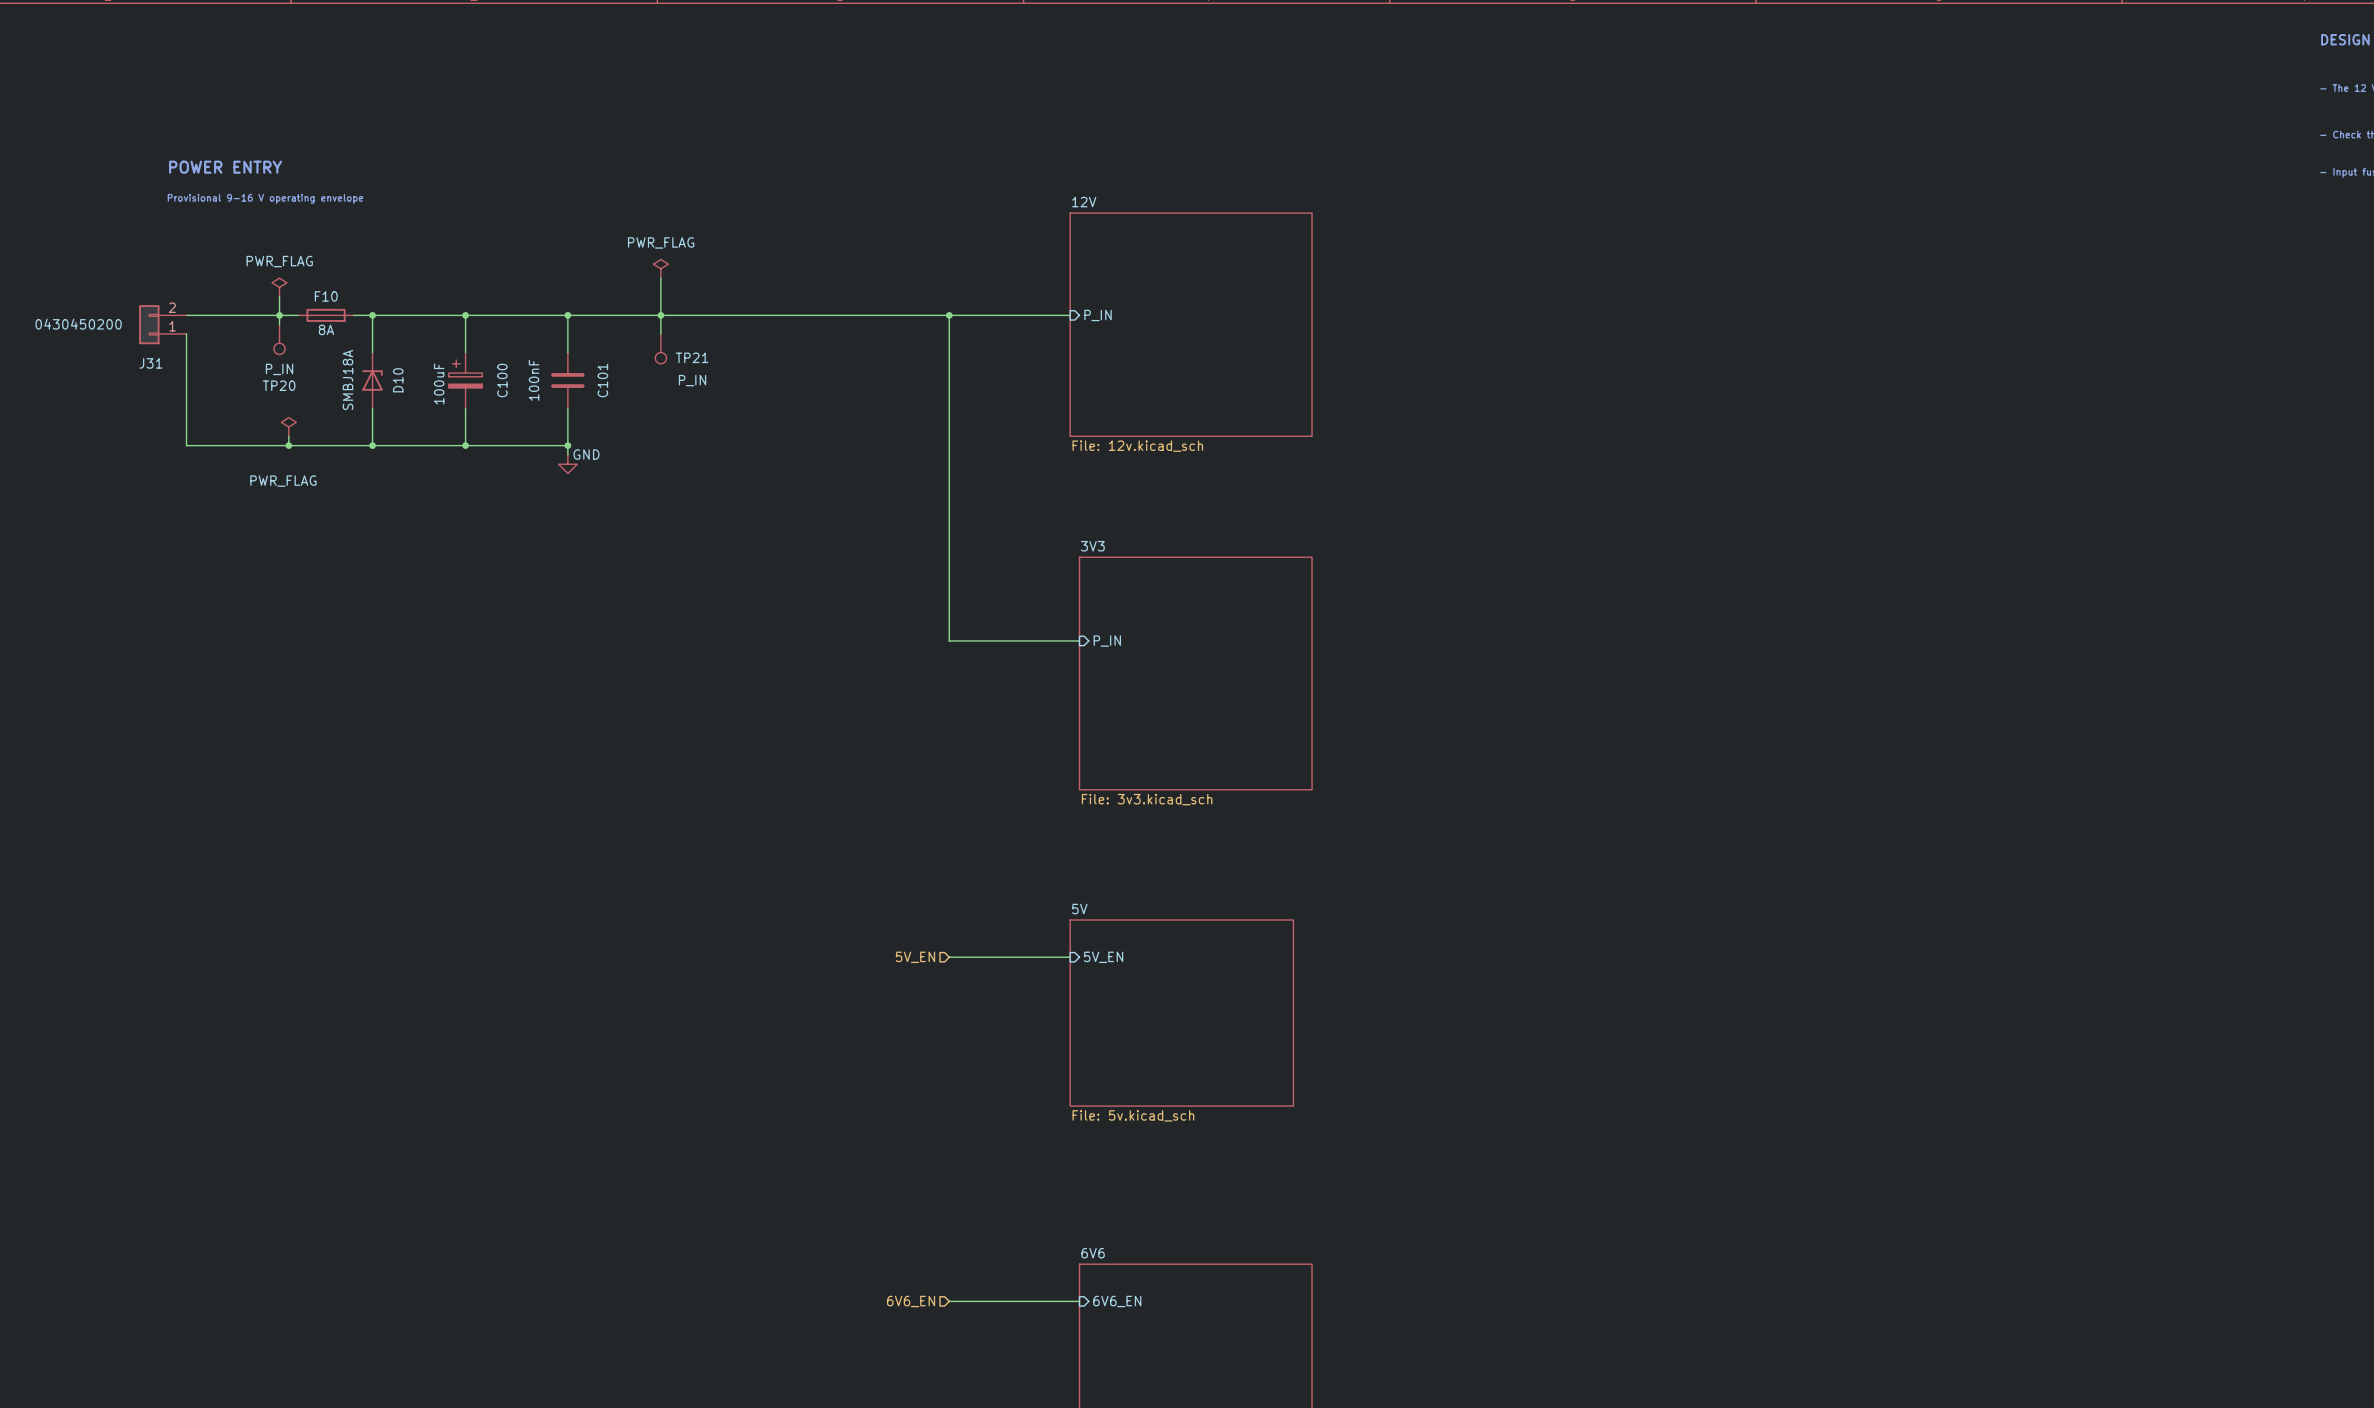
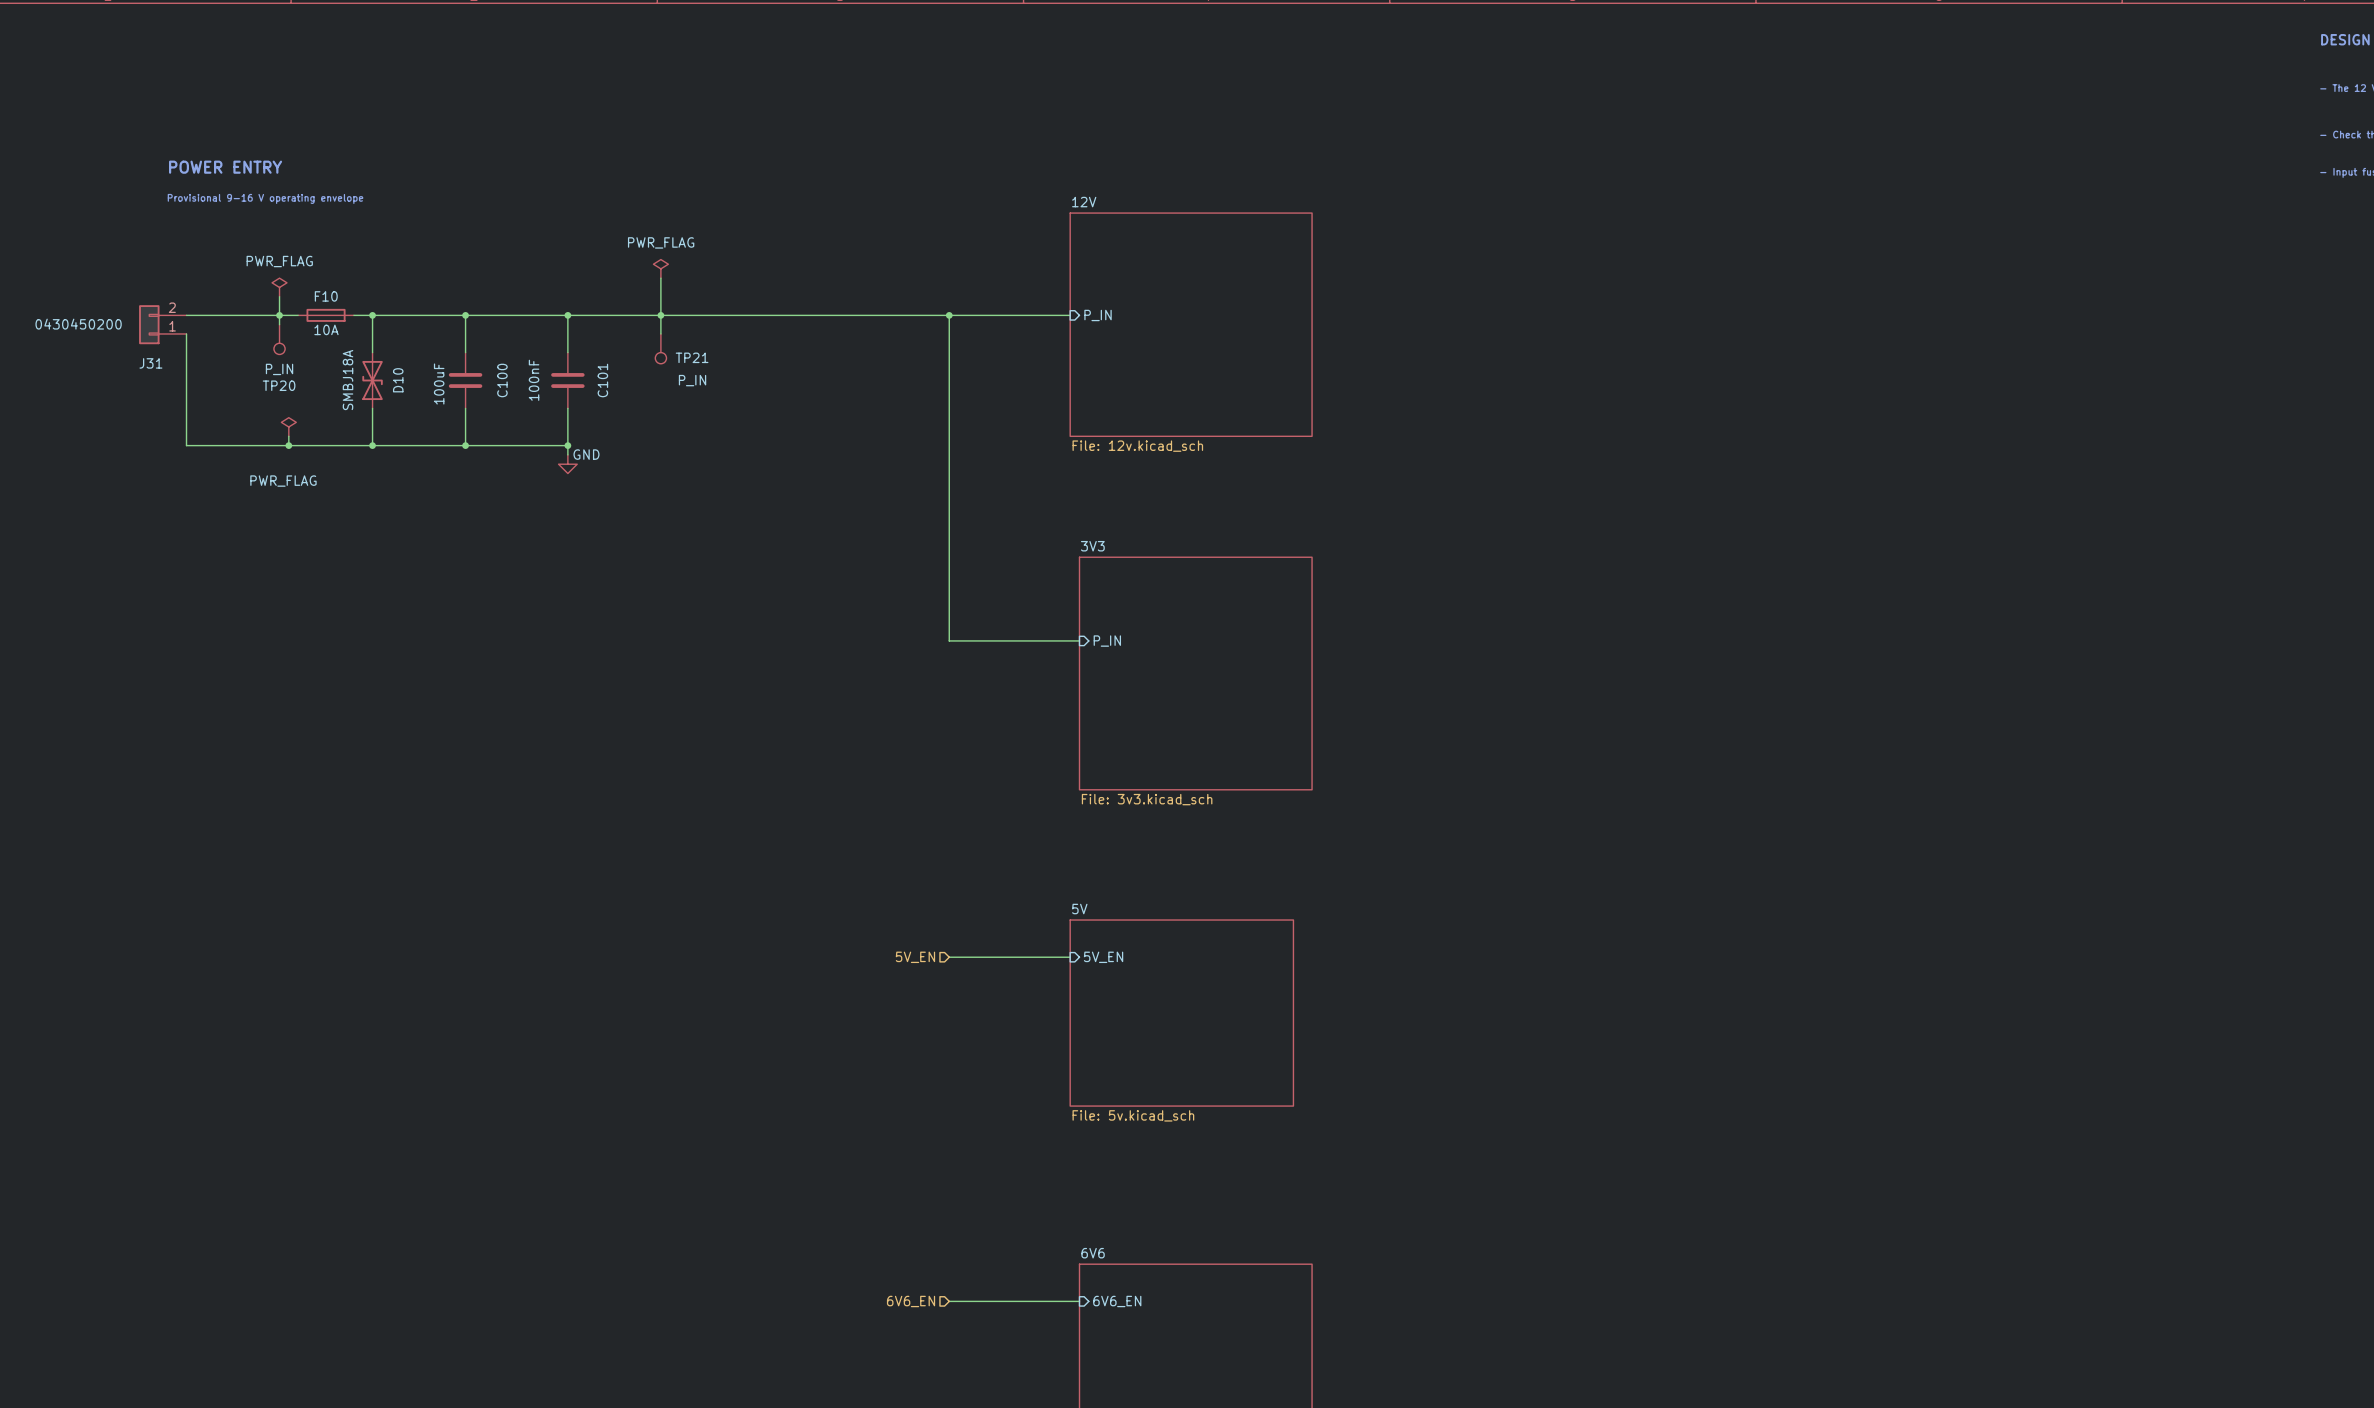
F10 value: 8A (326, 329) -> 10A (326, 329)
D10 symbol: [362, 352, 383, 409] -> [362, 352, 383, 409]
C100 symbol: [448, 352, 483, 409] -> [448, 352, 483, 409]

